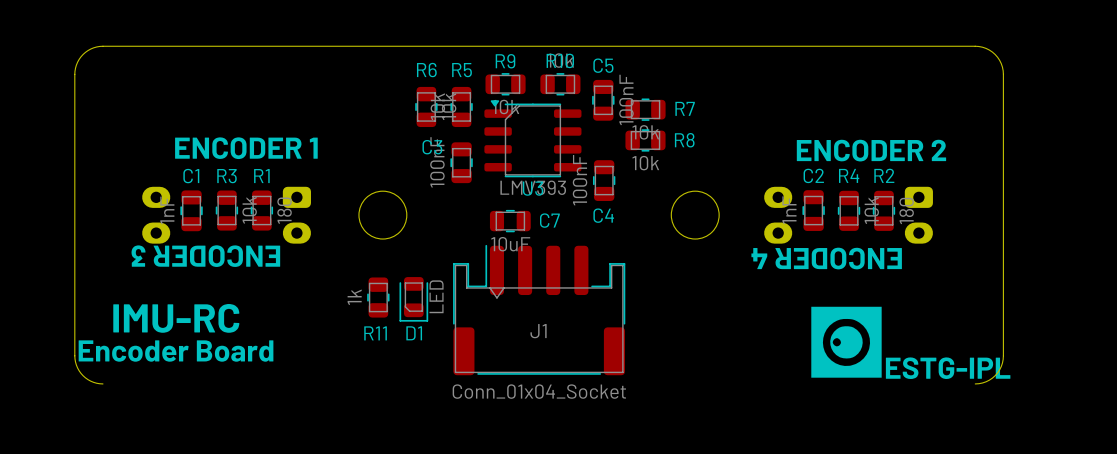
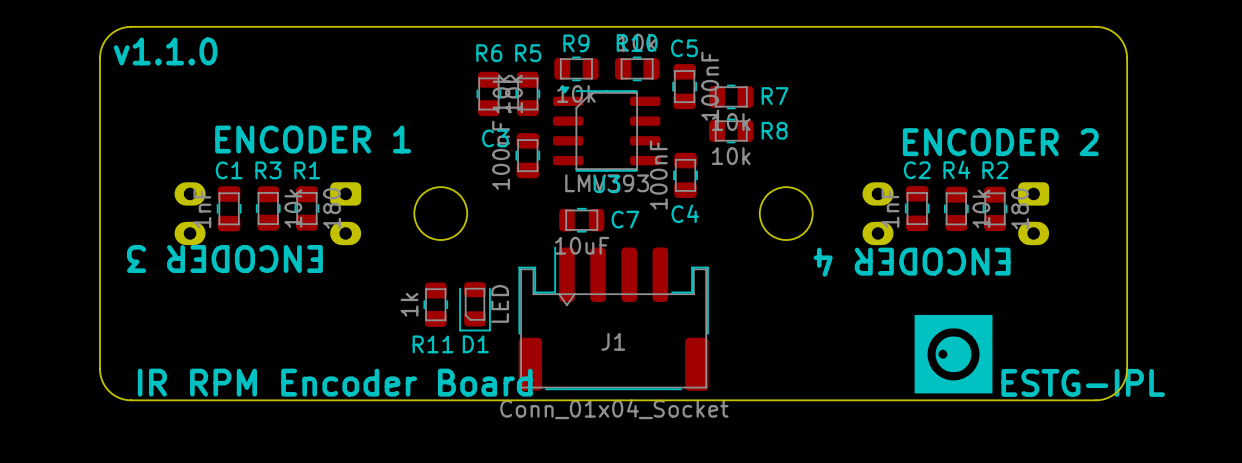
text: none -> v1.1.0 (165, 51)
text: IMU-RC (176, 318) -> none
text: Encoder Board (176, 351) -> IR RPM Encoder Board (335, 382)
board edge: none -> (131, 400) (1095, 400)

